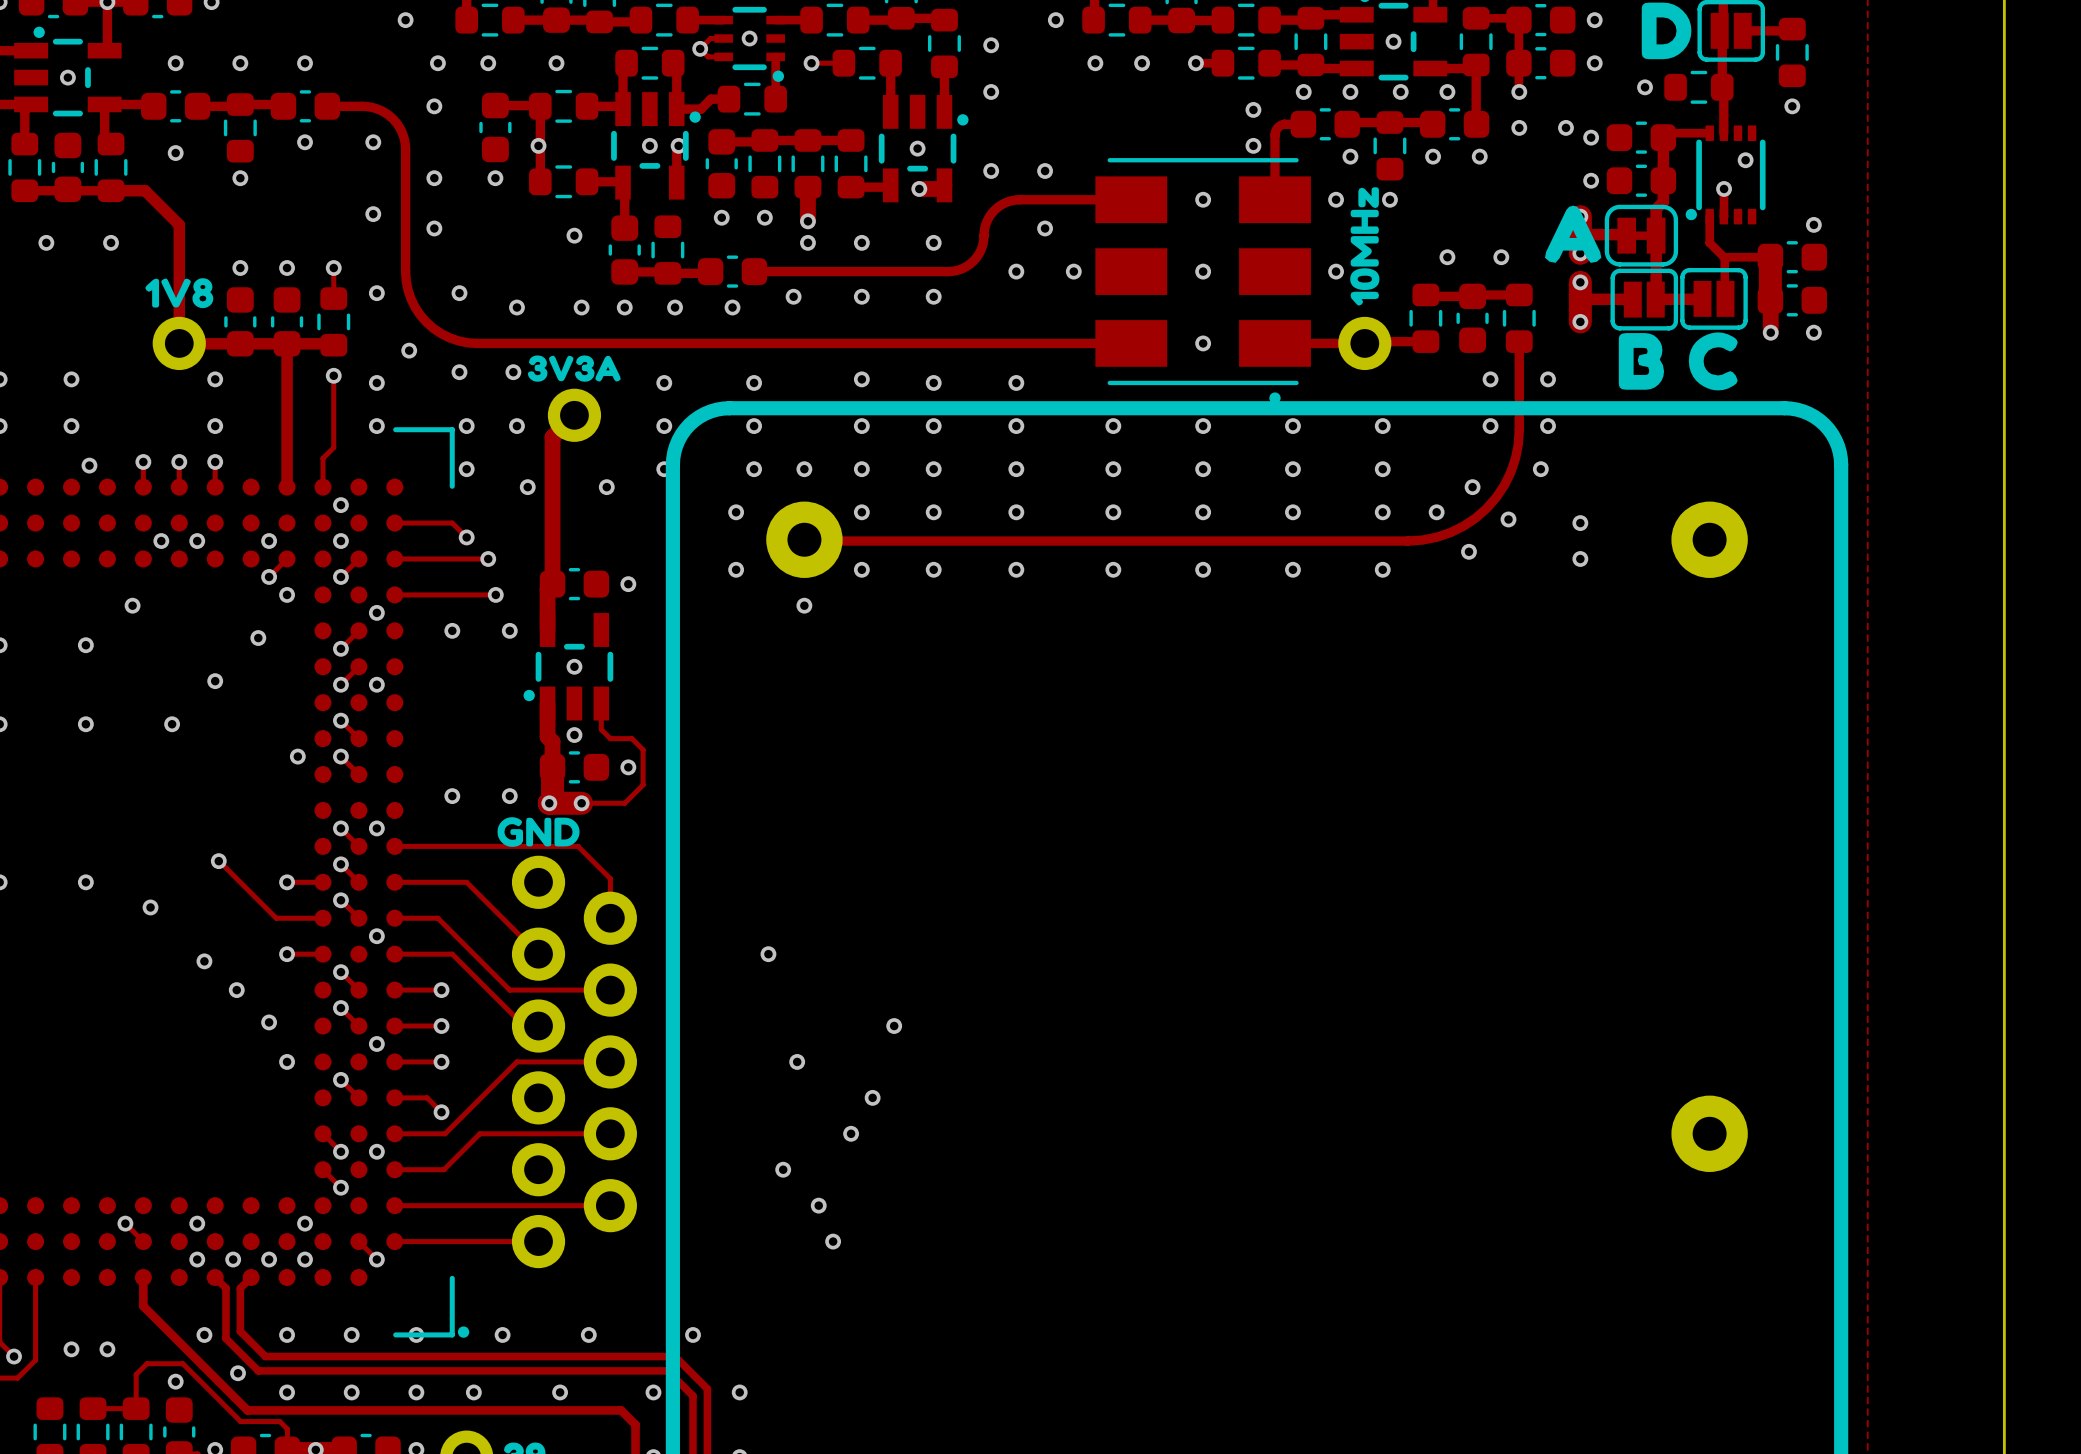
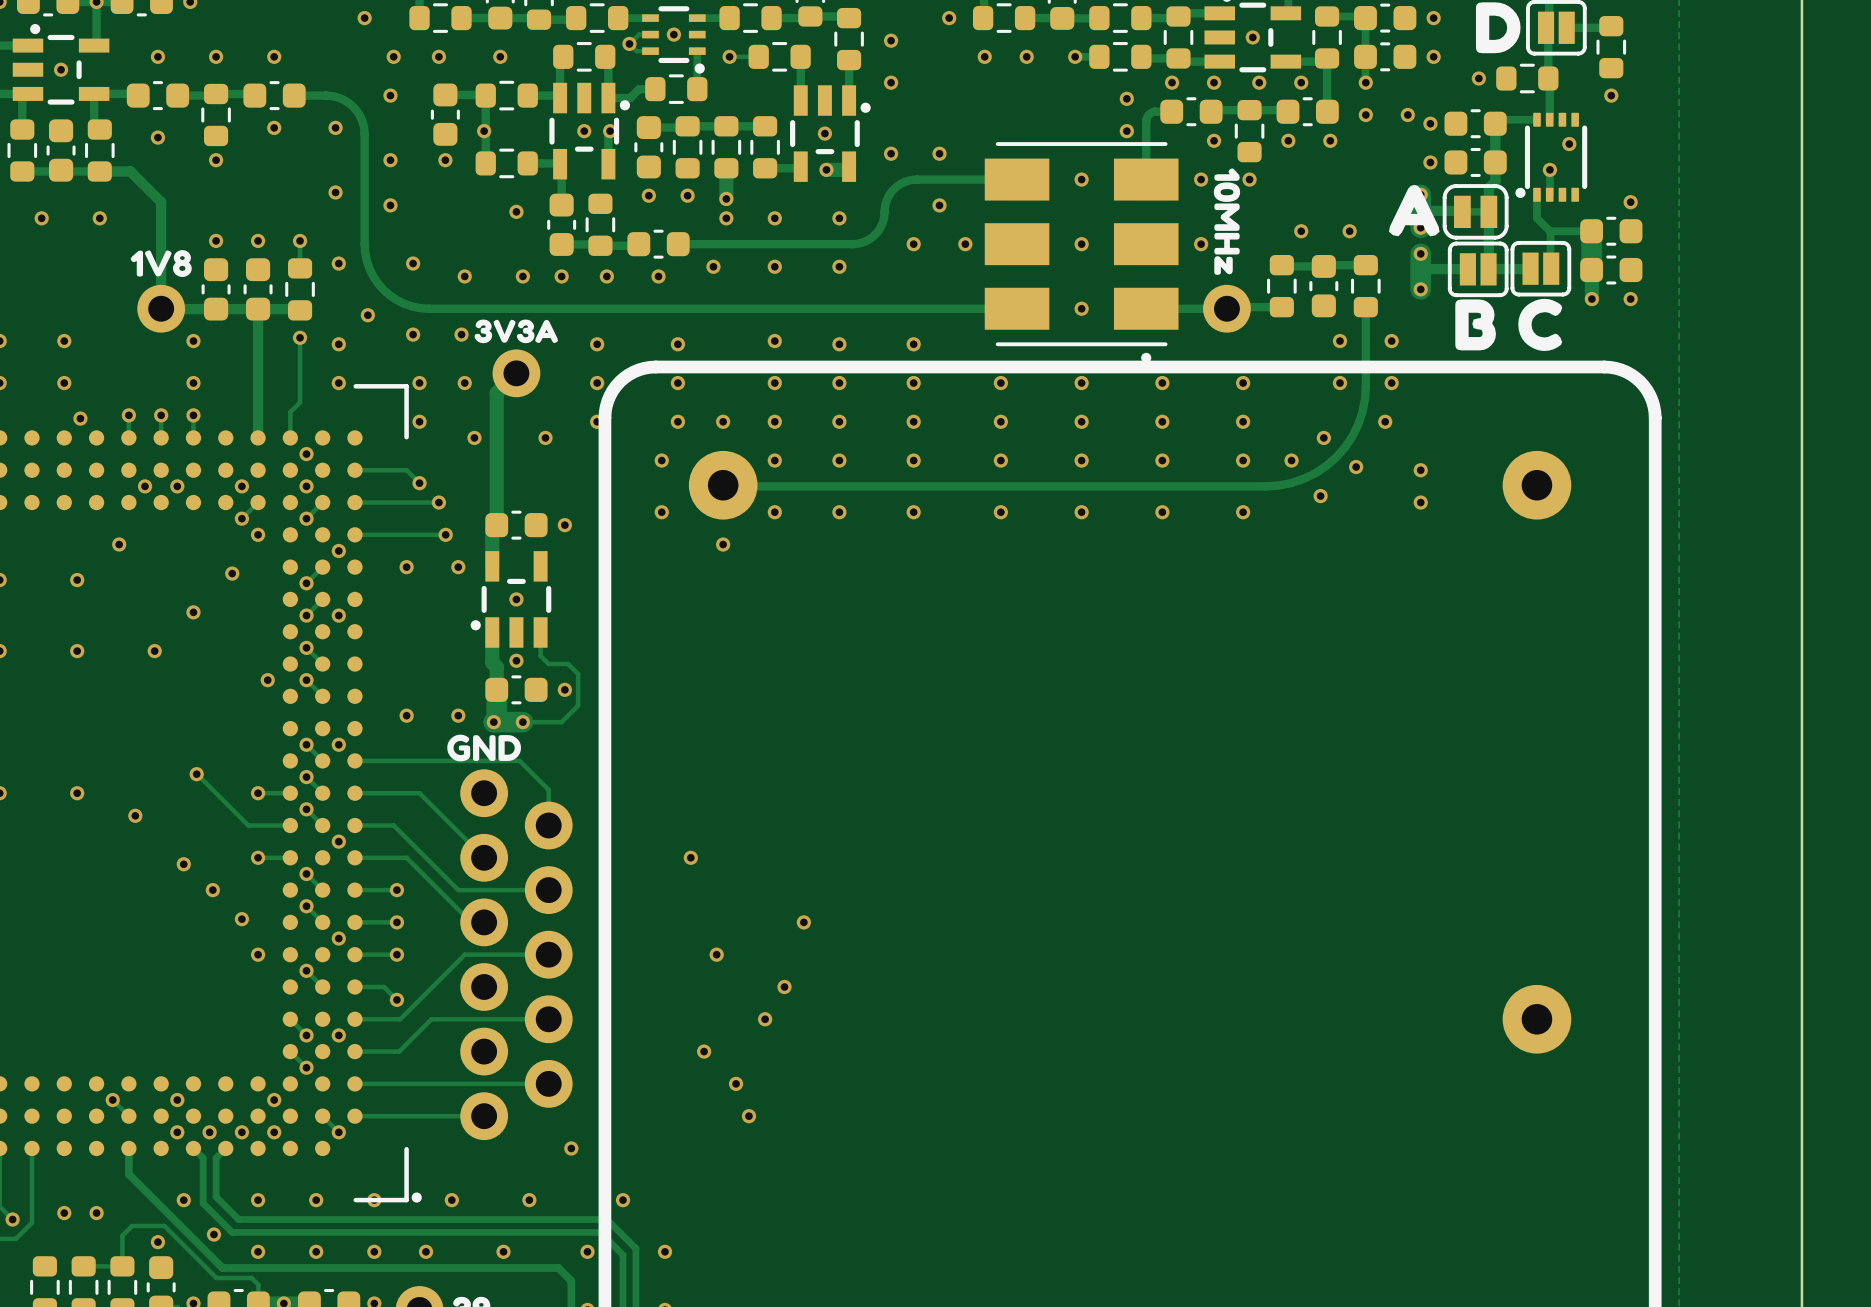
drawing shape: [1350, 187, 1380, 306] -> [1213, 168, 1241, 275]
via: none -> (571, 1148)

